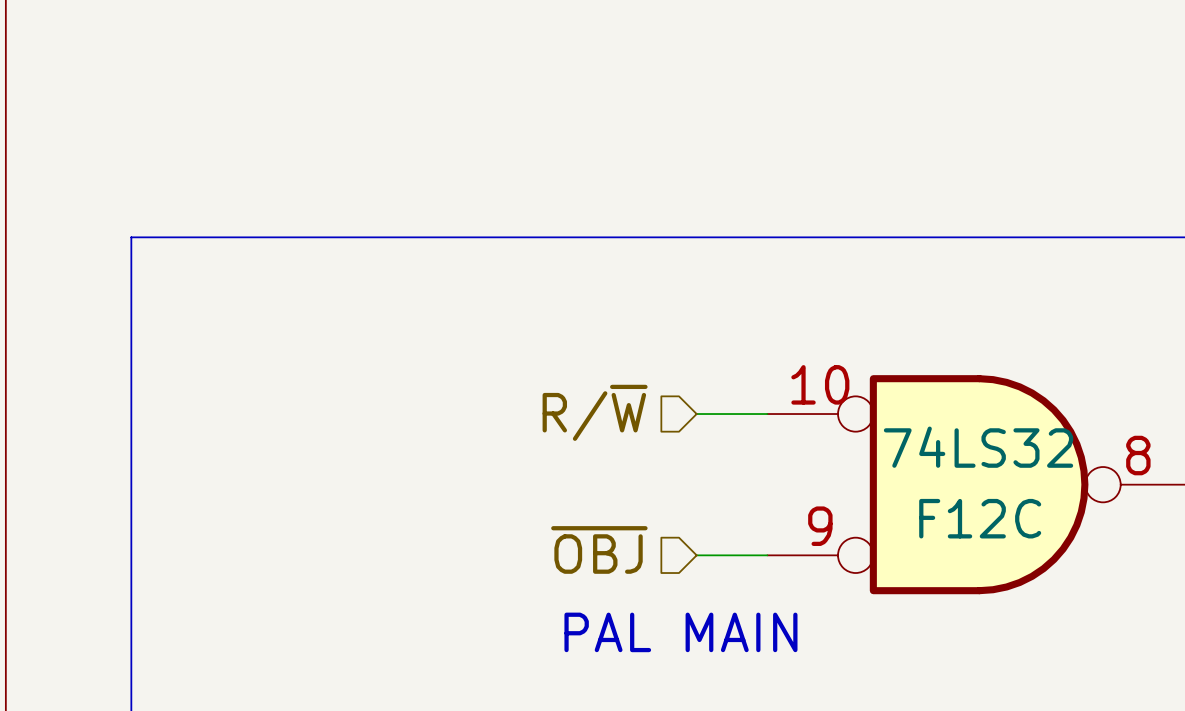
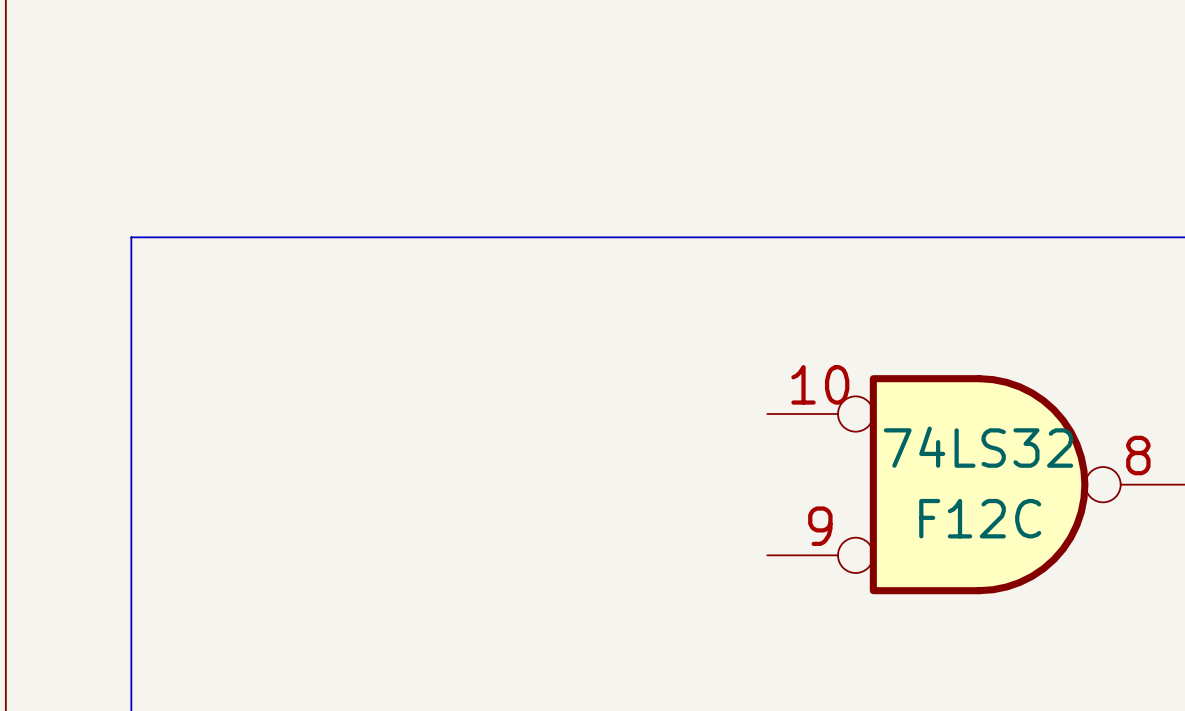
hierarchical label: R/~{W} (595, 412) -> none
wire: (696, 414) (767, 414) -> none
hierarchical label: ~{OBJ} (599, 549) -> none
wire: (696, 555) (767, 555) -> none
text: PAL MAIN (680, 632) -> none

